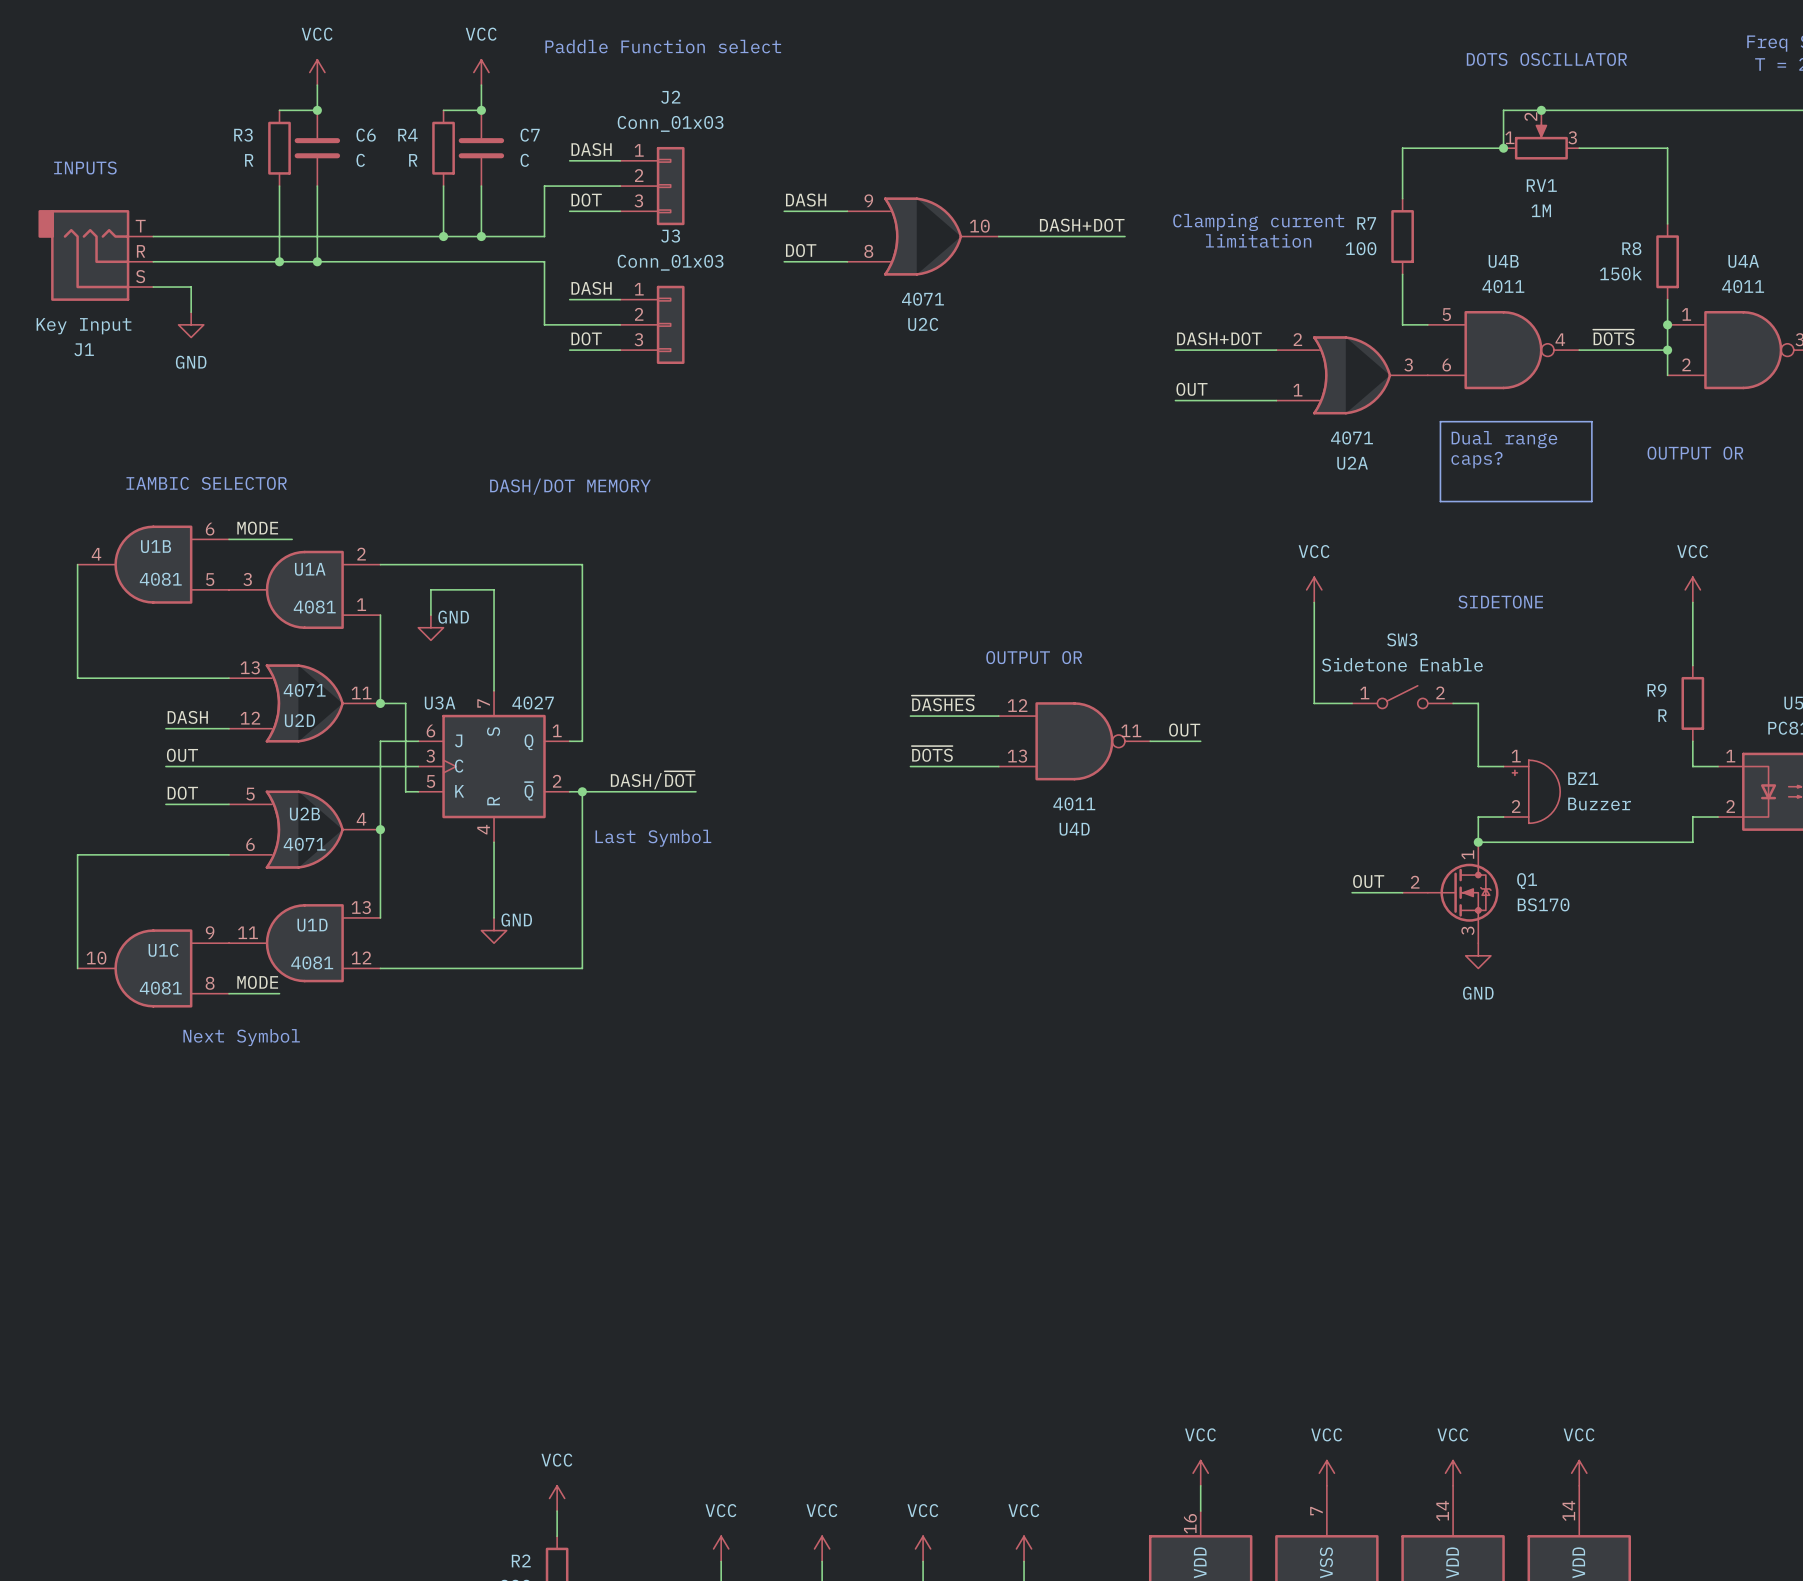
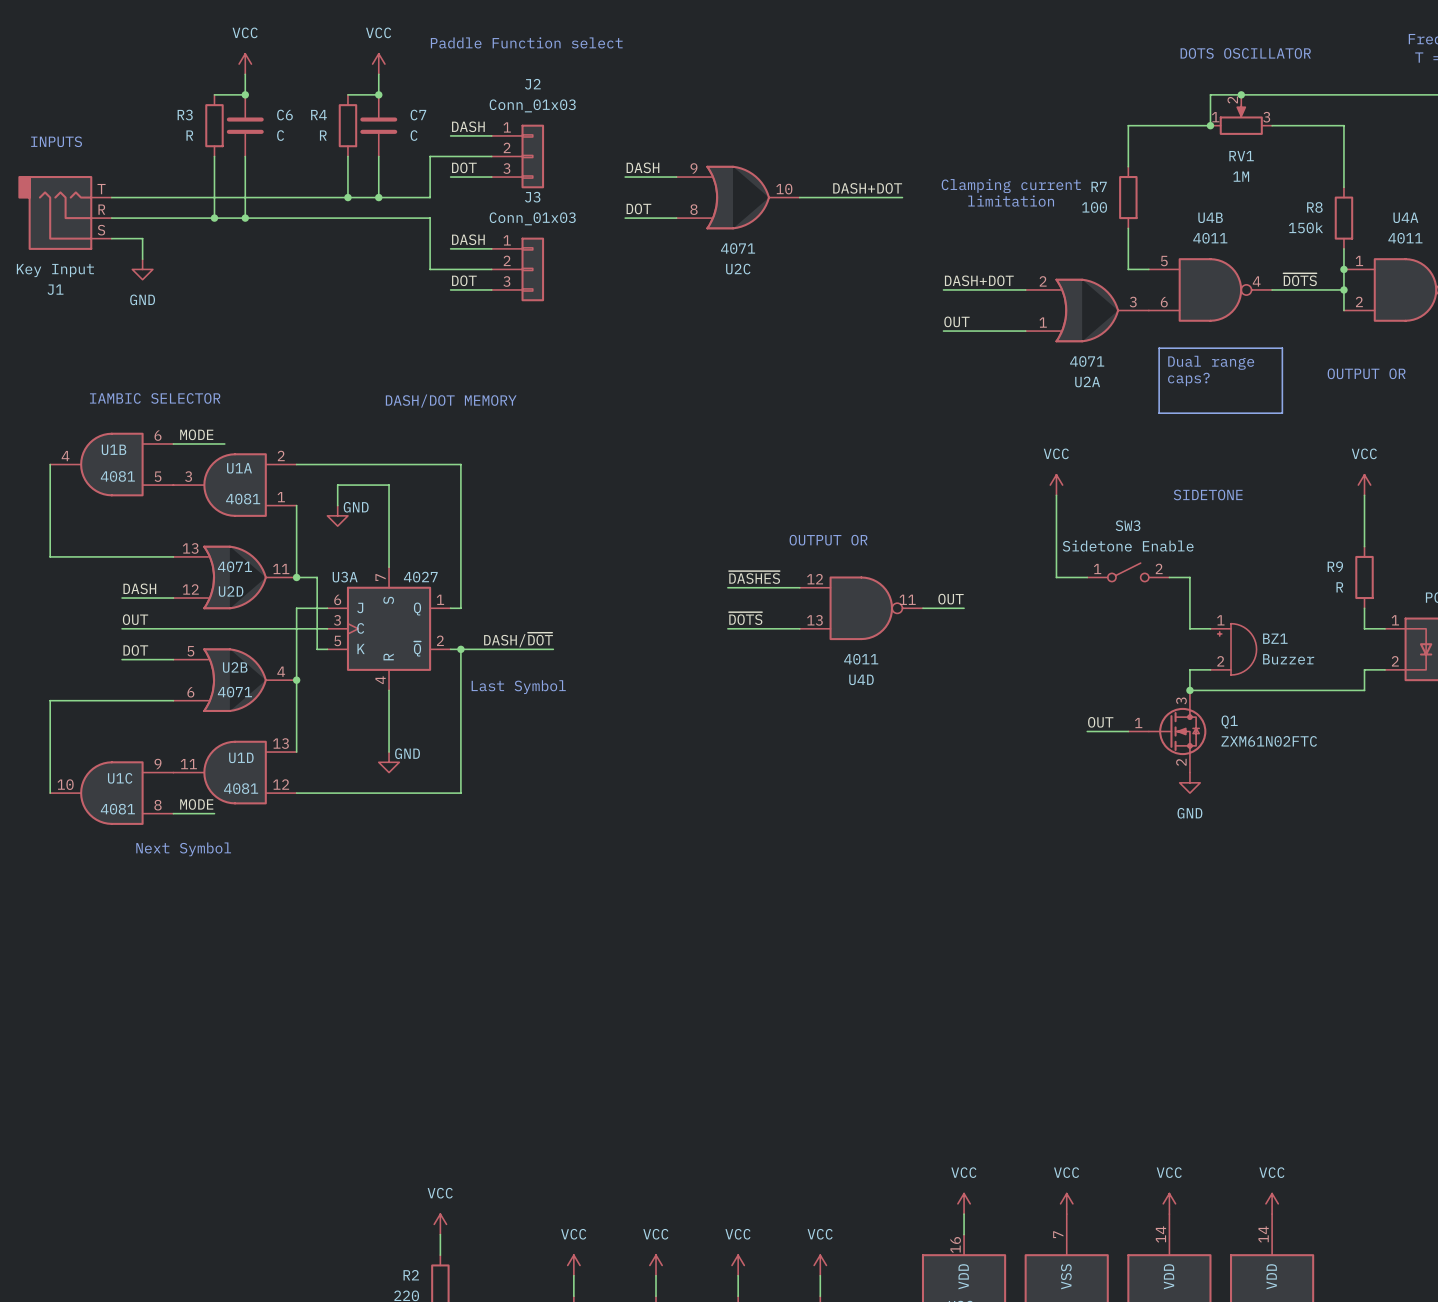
Q1 symbol: [1402, 842, 1499, 944] -> [1128, 690, 1207, 773]
Q1 value: BS170 (1543, 904) -> ZXM61N02FTC (1269, 741)

